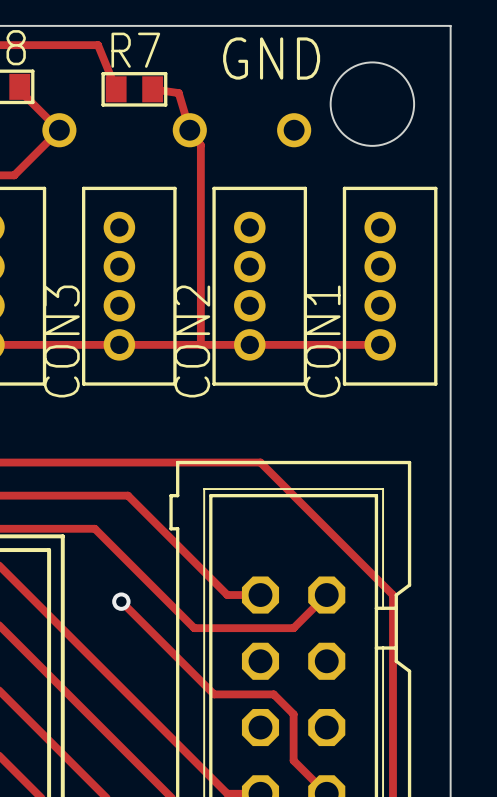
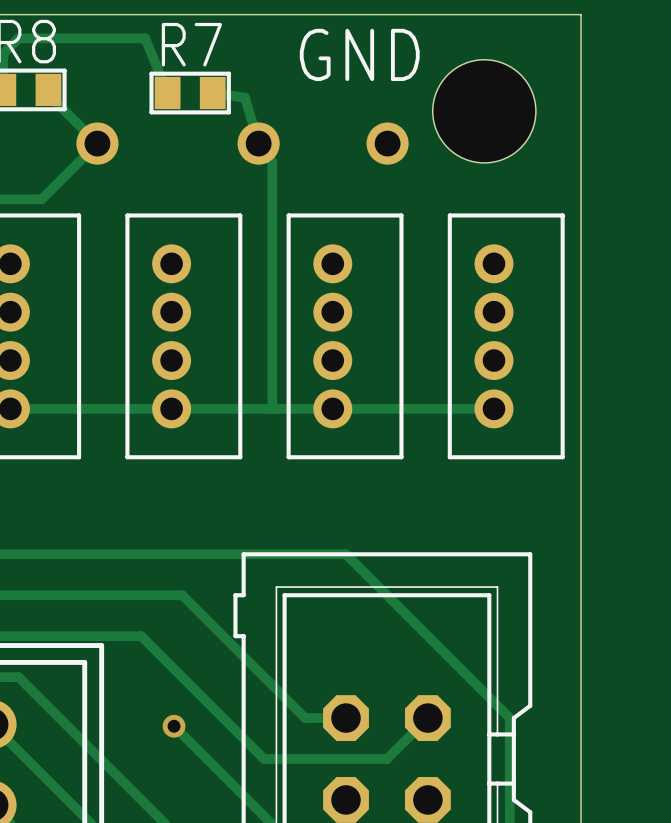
CON3 name: CON3 (61, 341) -> none
CON2 name: CON2 (192, 341) -> none
CON1 name: CON1 (322, 341) -> none

